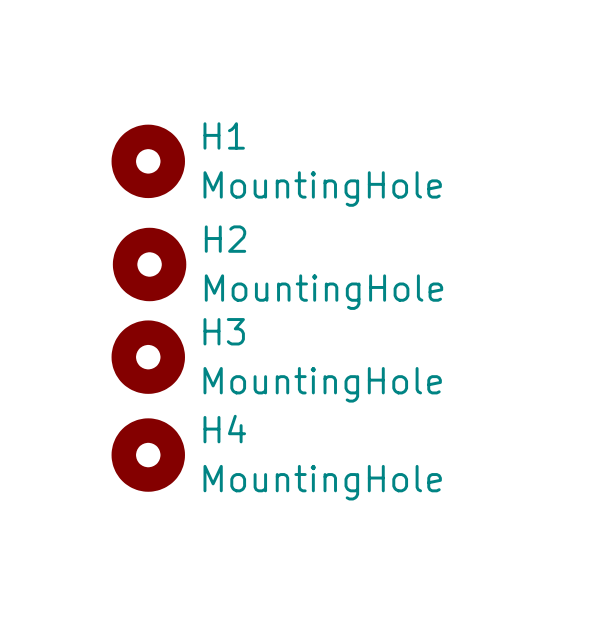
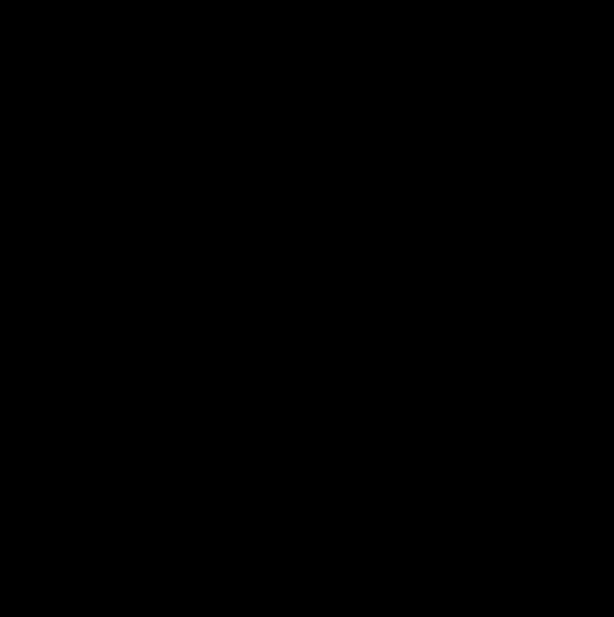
H1: MountingHole (148, 161) -> none
H2: MountingHole (149, 264) -> none
H3: MountingHole (148, 357) -> none
H4: MountingHole (148, 455) -> none

